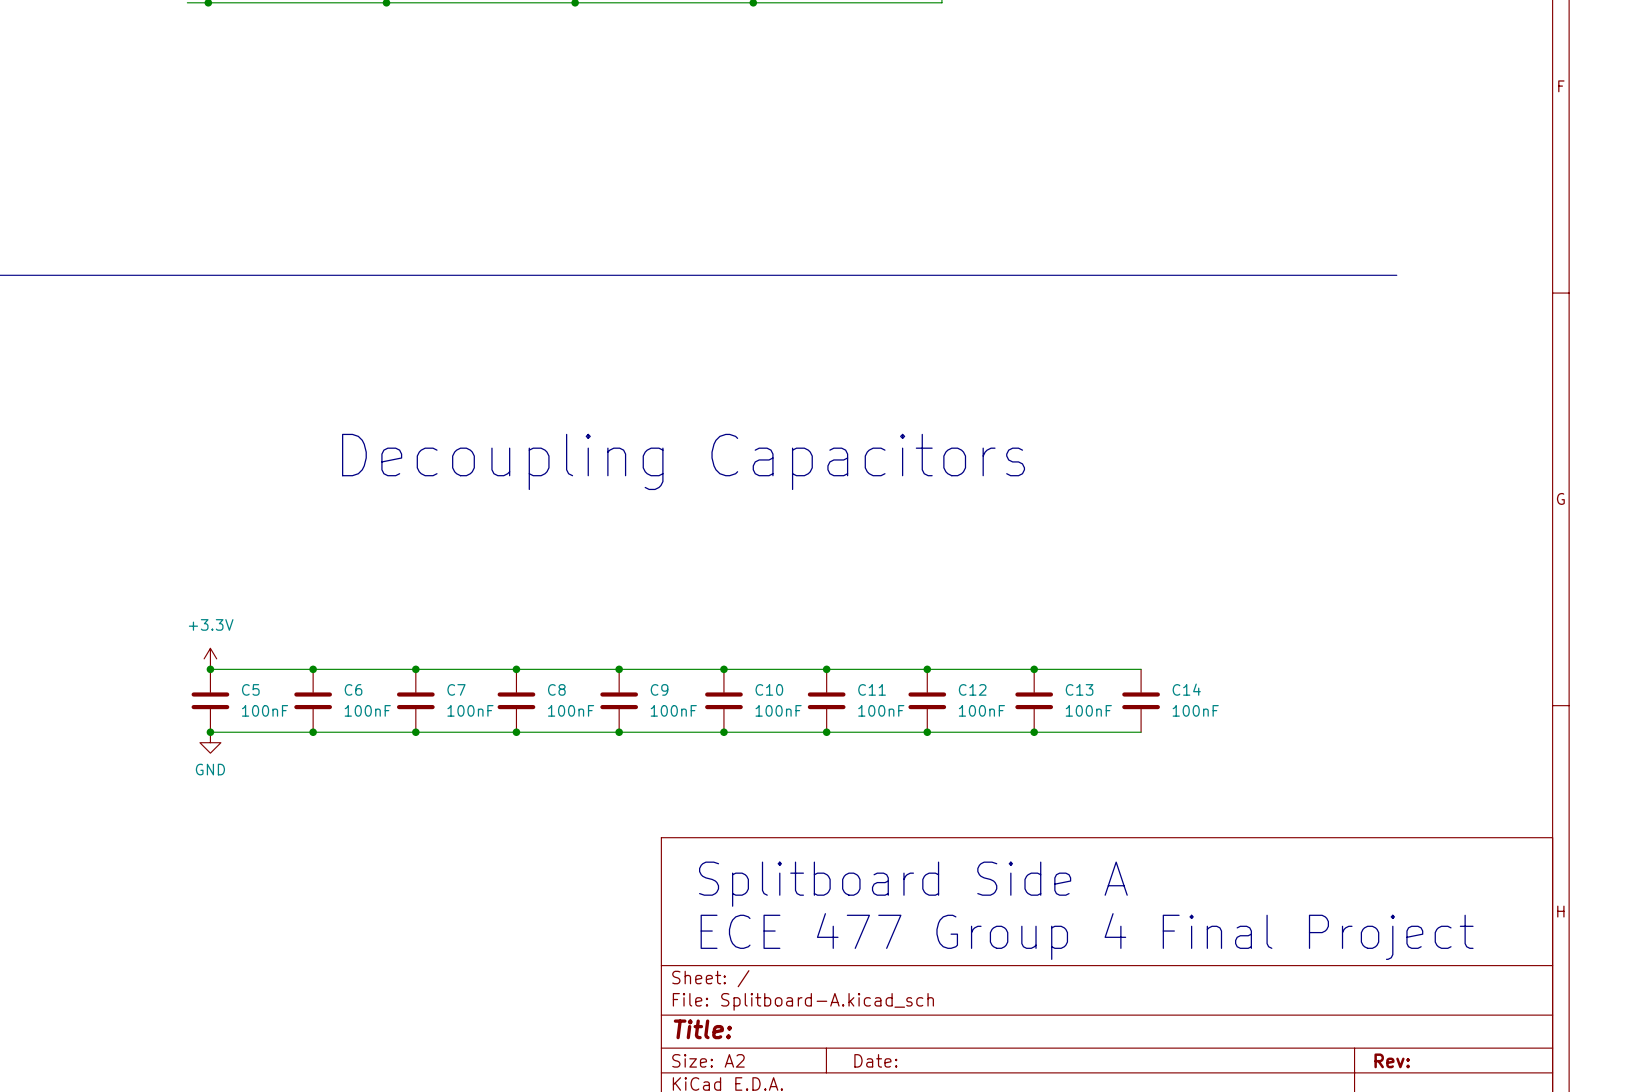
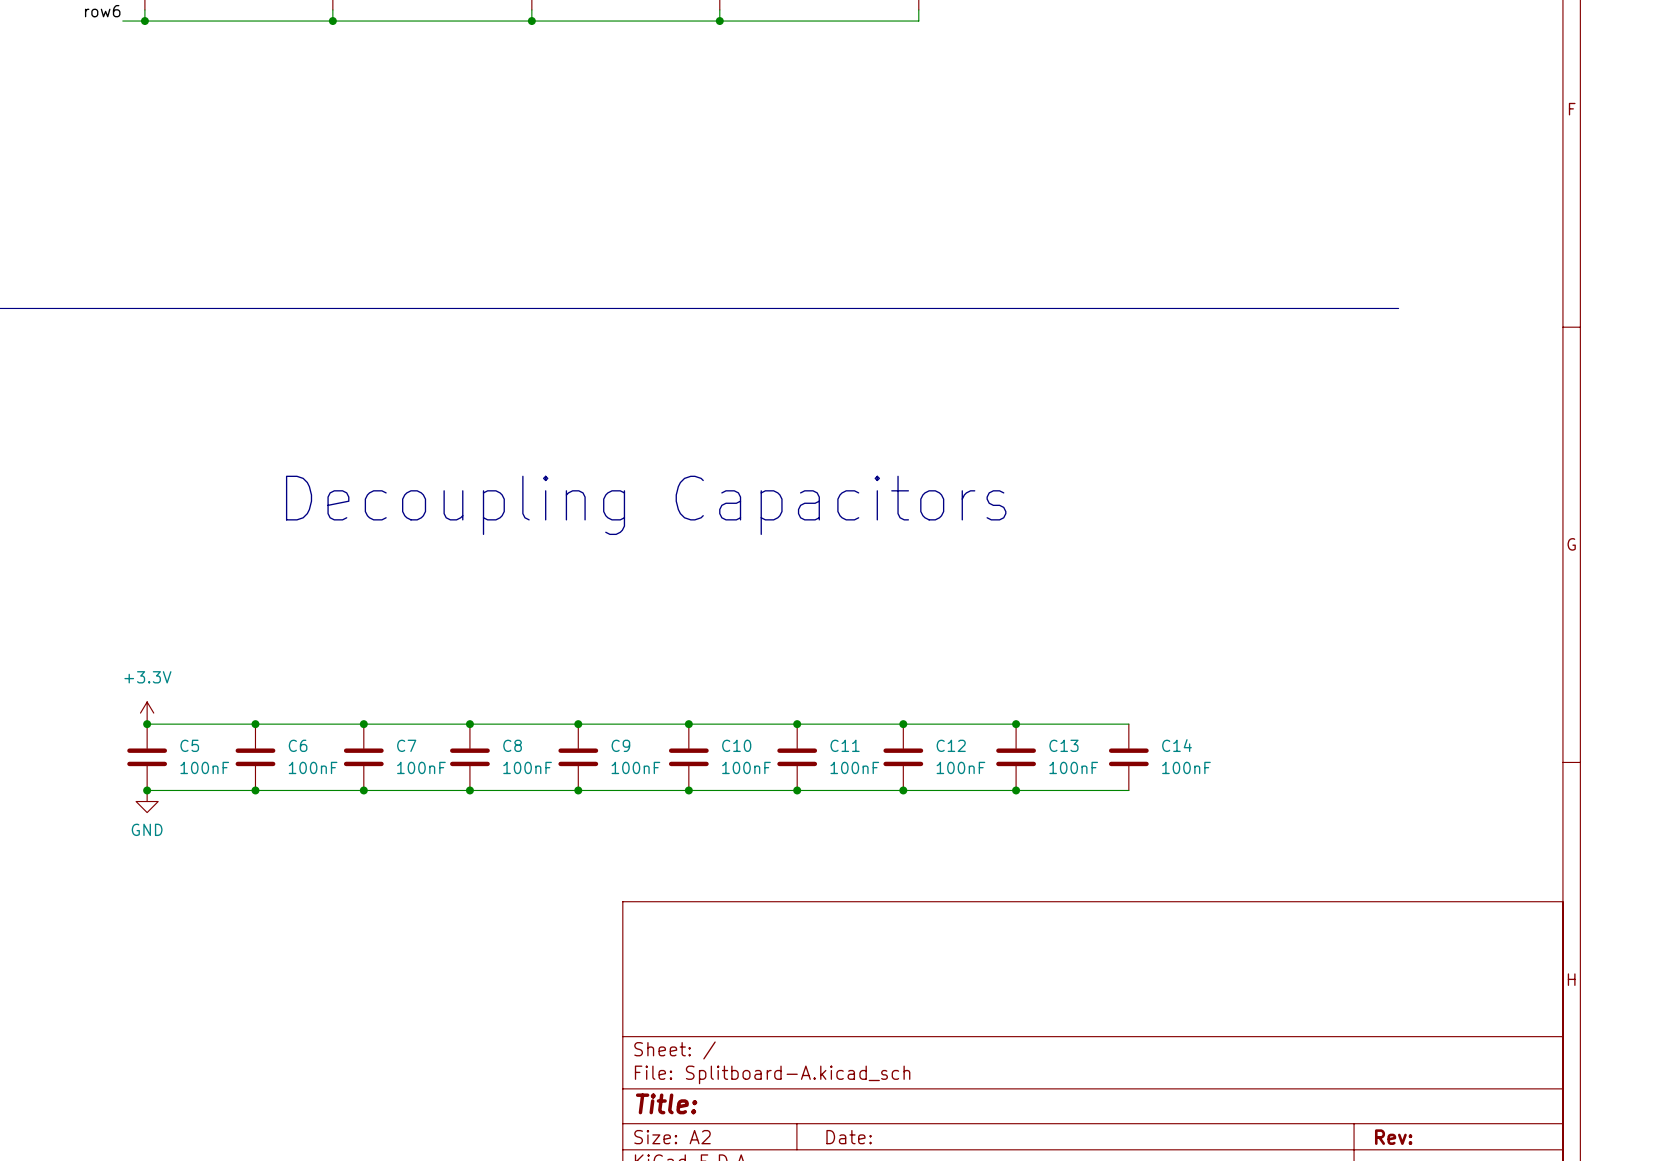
text: Splitboard Side A (913, 884) -> none
text: ECE 477 Group 4 Final Project (1087, 936) -> none

